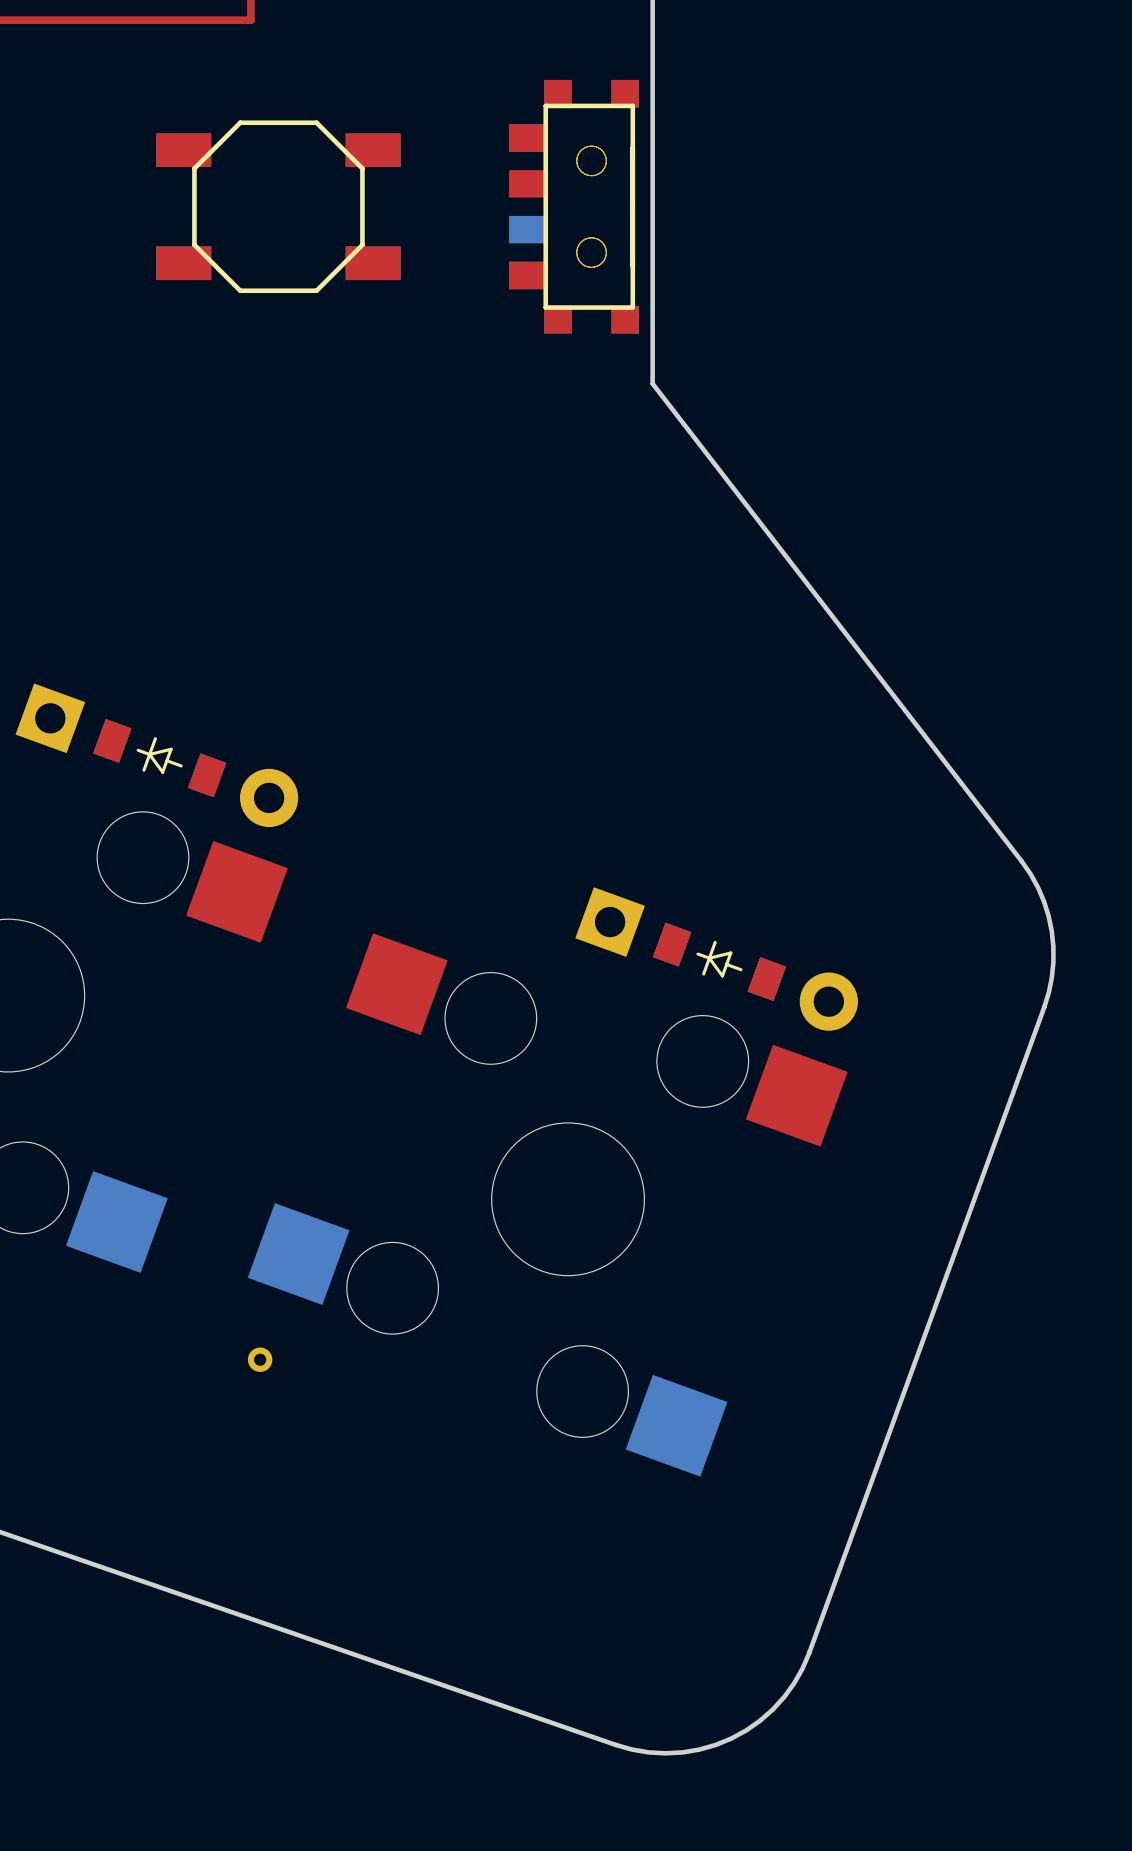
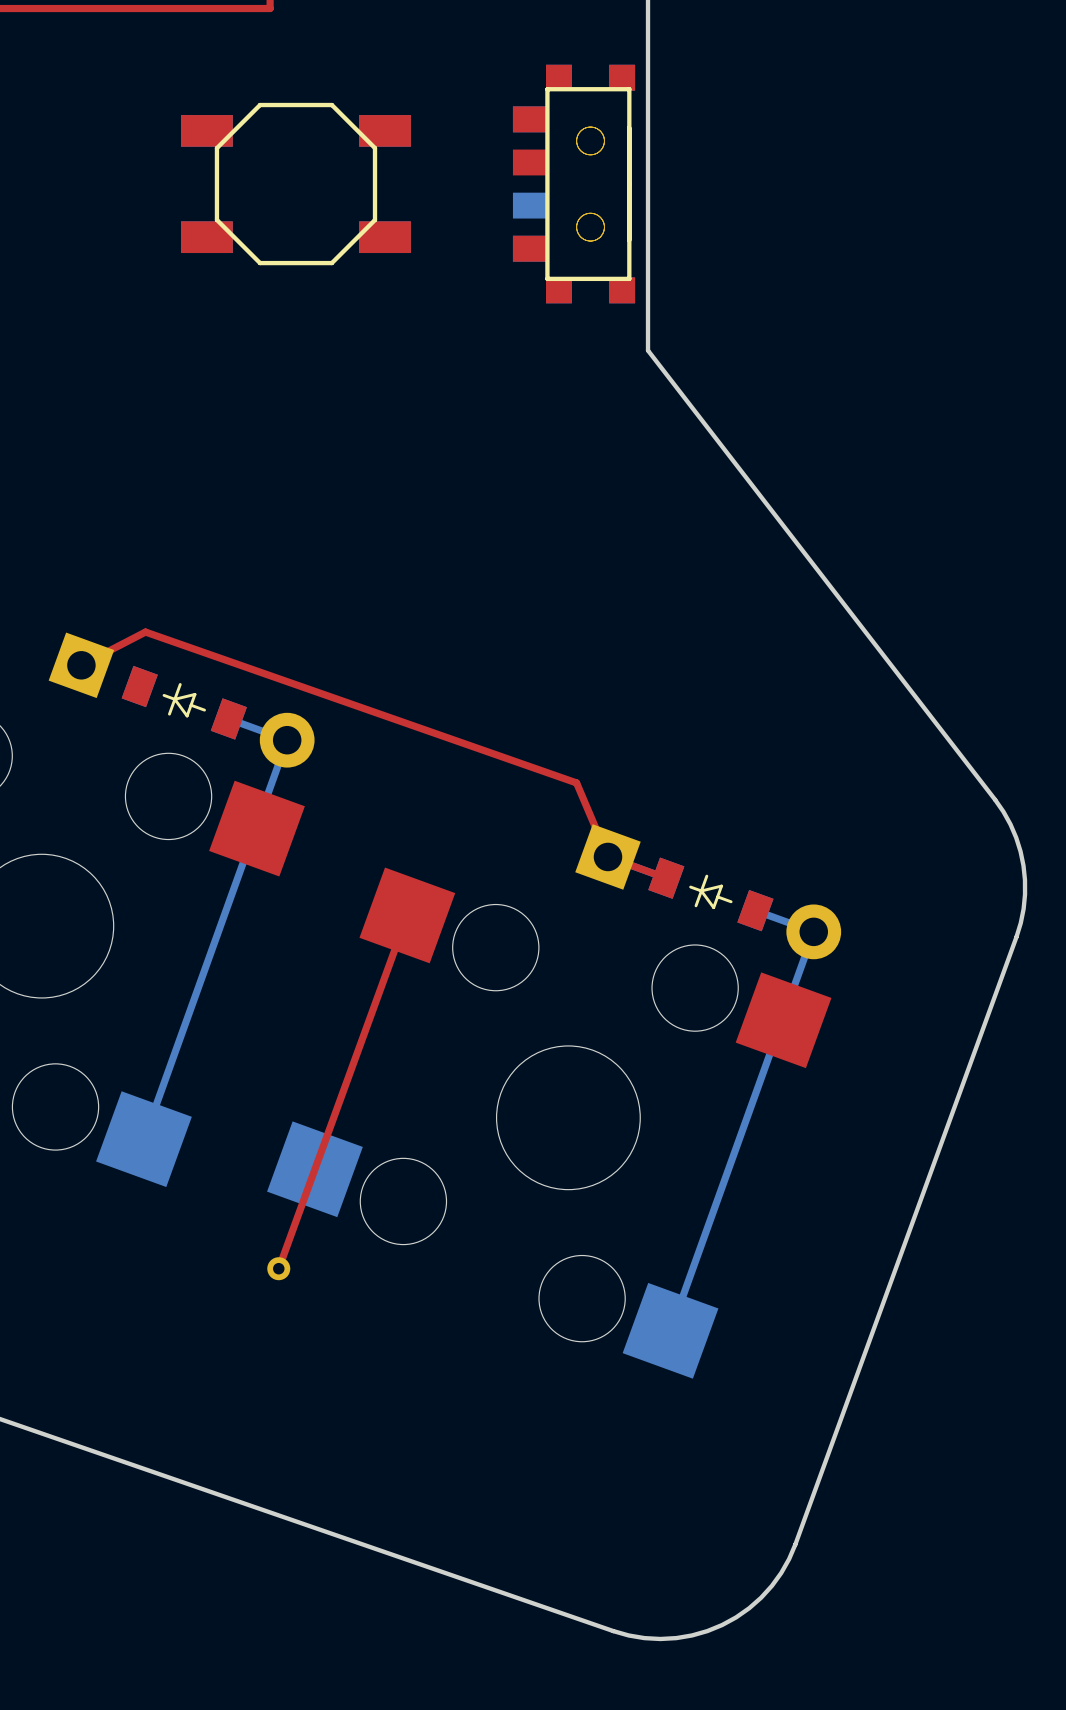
top track: none -> (80, 660) (81, 665) (145, 632) (576, 782) (607, 856) (666, 878)
bottom track: none -> (228, 718) (287, 740) (143, 1139)
bottom track: none -> (755, 910) (813, 931) (670, 1330)
top track: none -> (407, 915) (278, 1268)

